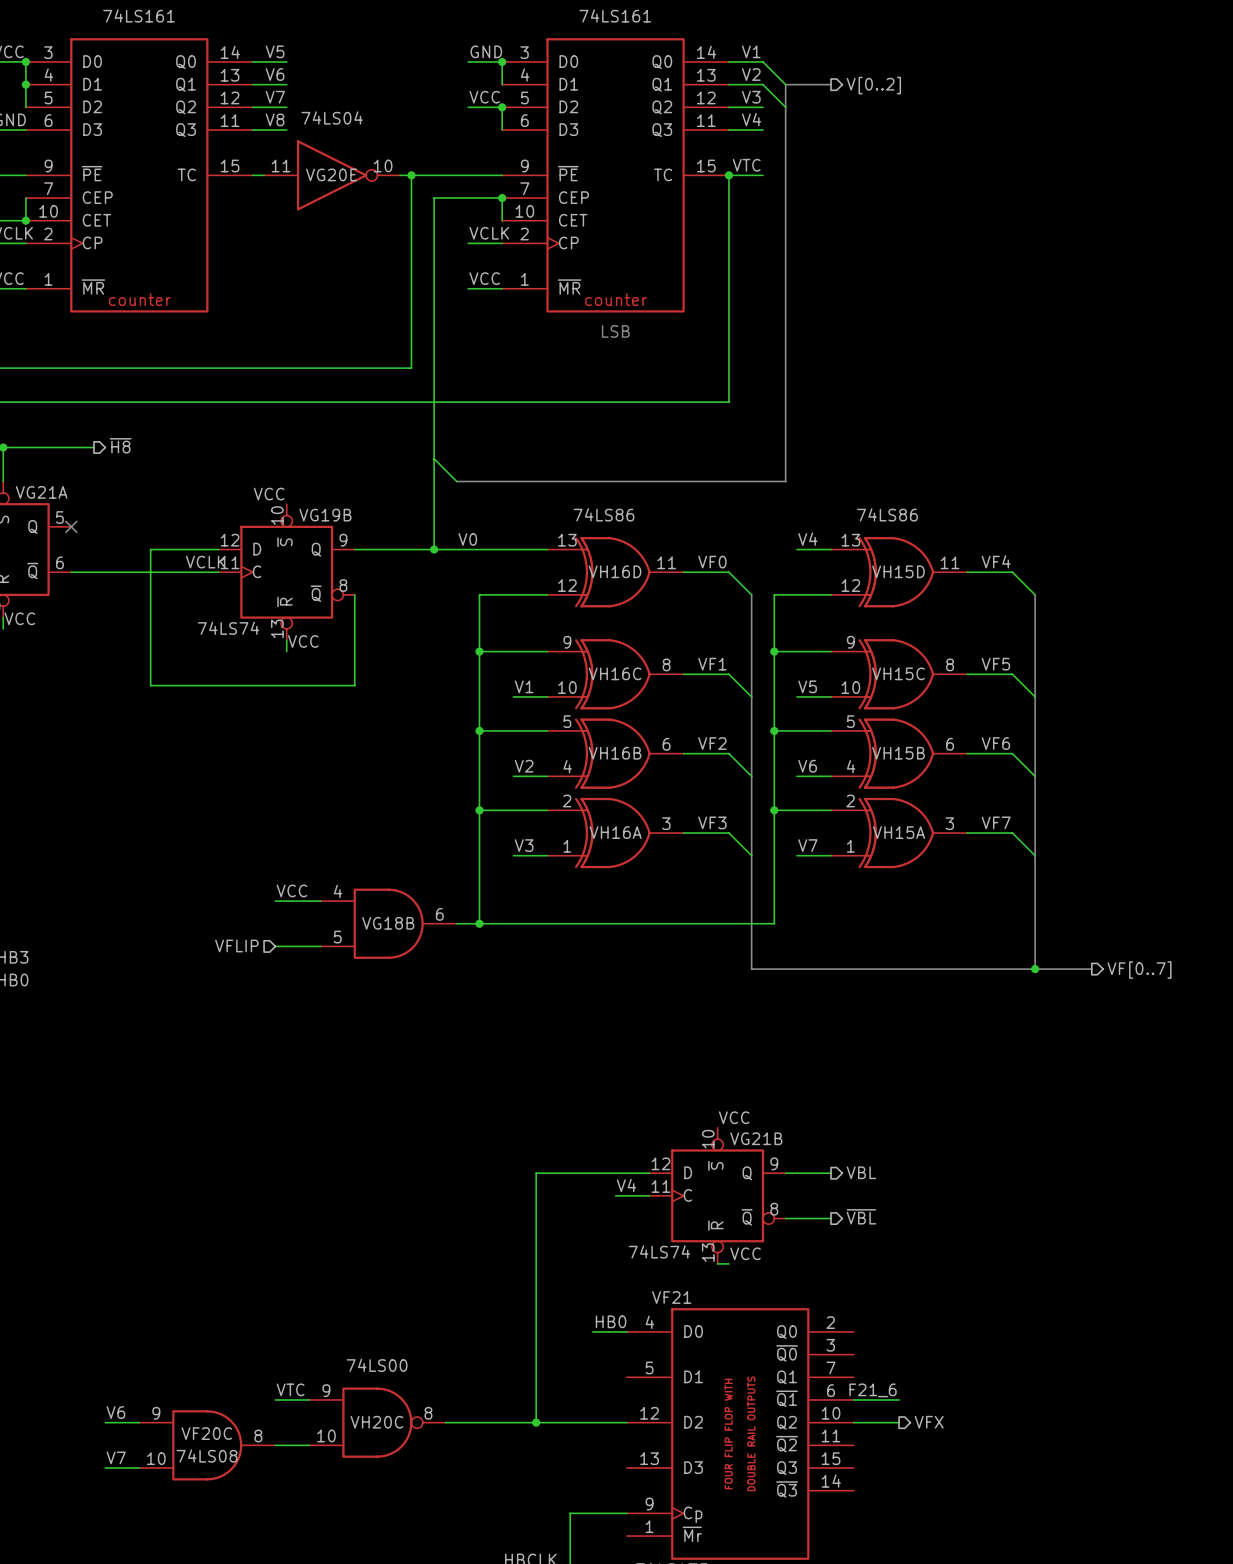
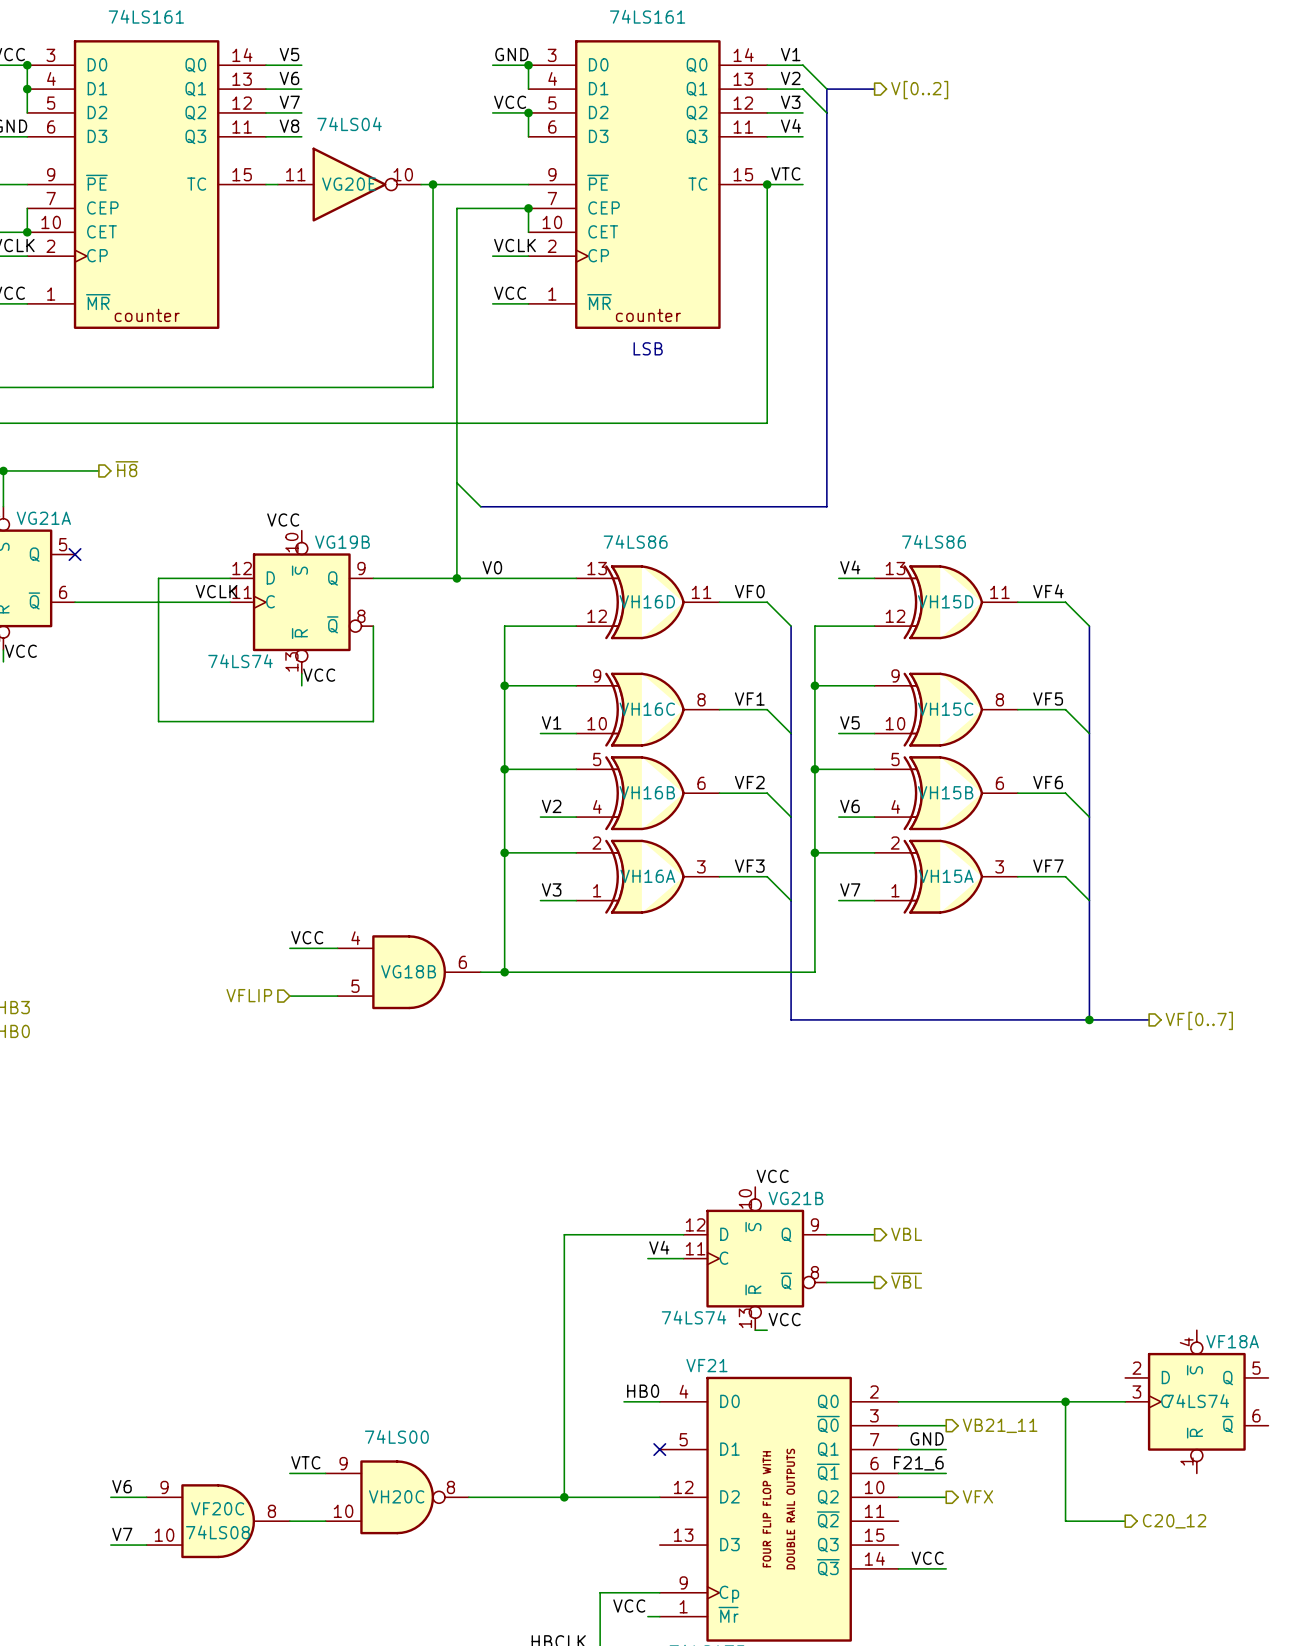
wire: none -> (898, 1401) (1125, 1401)
wire: none -> (1065, 1401) (1065, 1521) (1125, 1521)
junction: none -> (1065, 1401)
VF18A: none -> 74LS74 (1196, 1401)
wire: none -> (898, 1425) (946, 1425)
hierarchical label: none -> VB21_11 (1000, 1425)
label: none -> GND (927, 1438)
no-connect mark: none -> (659, 1449)
wire: none -> (898, 1449) (946, 1449)
hierarchical label: none -> C20_12 (1174, 1521)
label: none -> VCC (927, 1558)
wire: none -> (898, 1568) (946, 1568)
label: none -> VCC (629, 1605)
wire: none -> (647, 1616) (659, 1616)

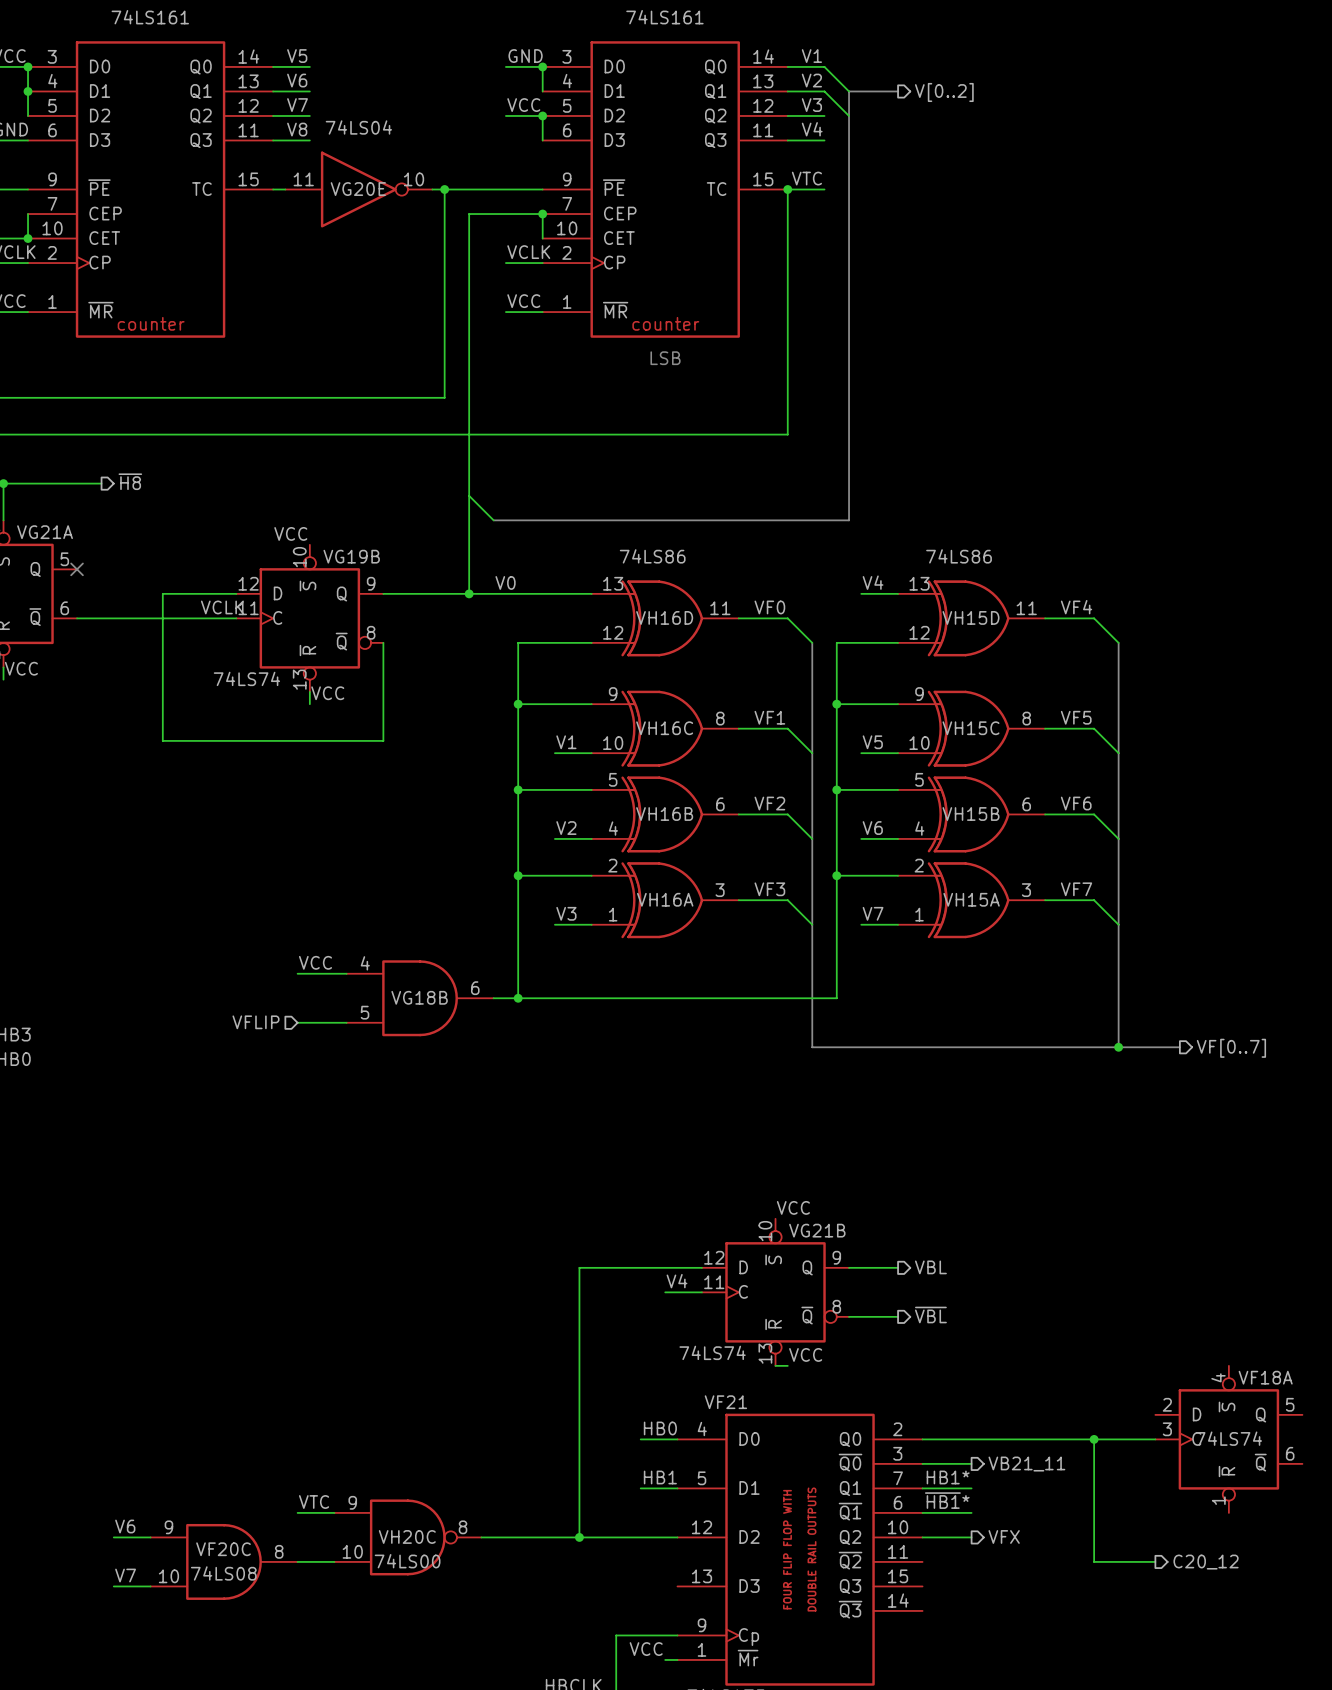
VH20C value position: 74LS00 (396, 1436) -> 74LS00 (407, 1561)
label: none -> HB1 (660, 1477)
label: GND (927, 1438) -> HB1* (948, 1477)
wire: none -> (640, 1488) (677, 1488)
no-connect mark: (659, 1449) -> none
label: F21_6 (918, 1463) -> ~{HB1}* (947, 1500)
label: VCC (927, 1558) -> none
wire: (898, 1568) (946, 1568) -> none

